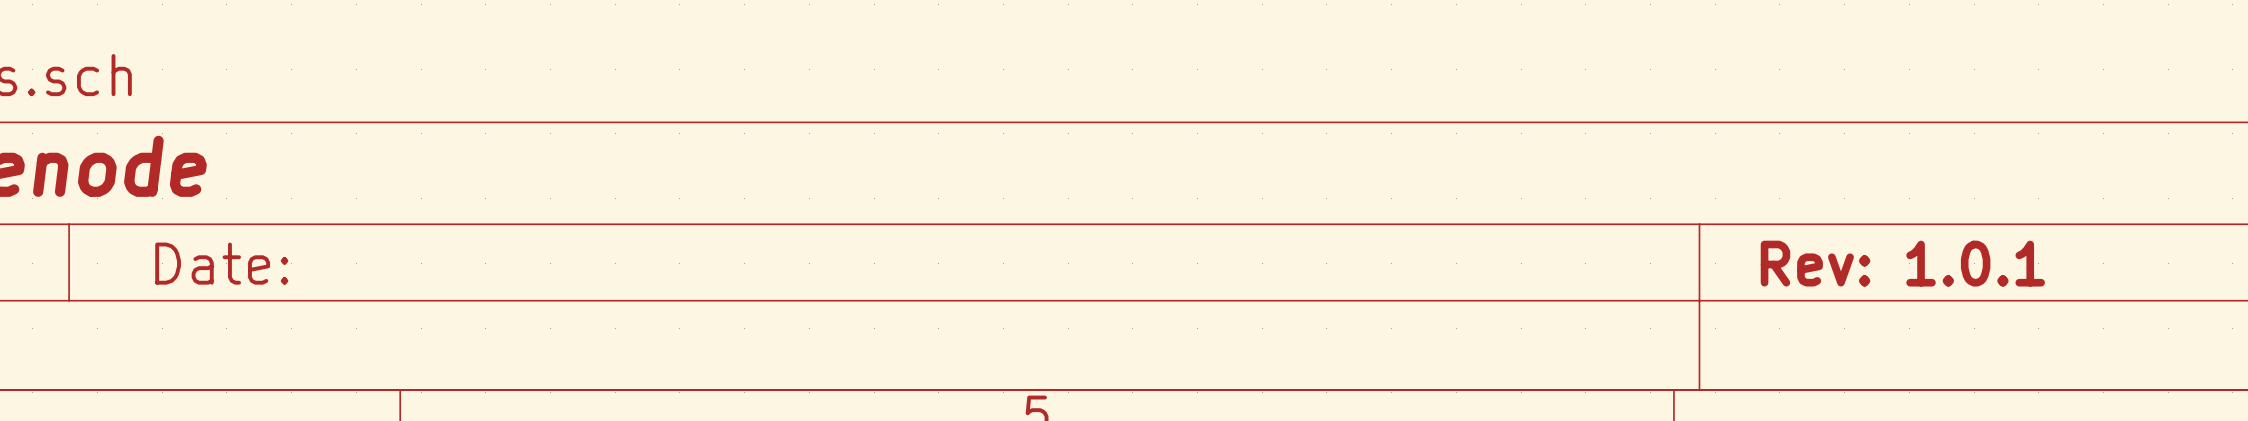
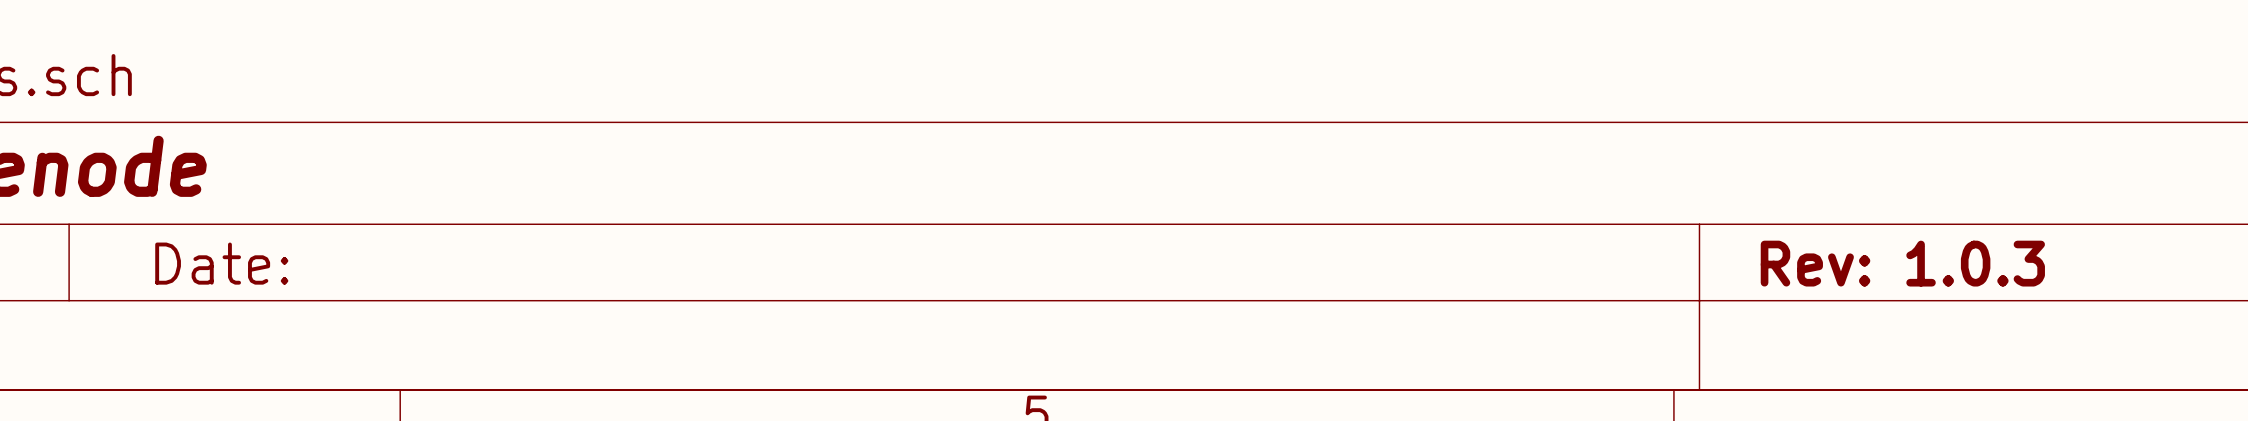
title block: Rev: 1.0.1 (1902, 263) -> Rev: 1.0.3 (1902, 263)

